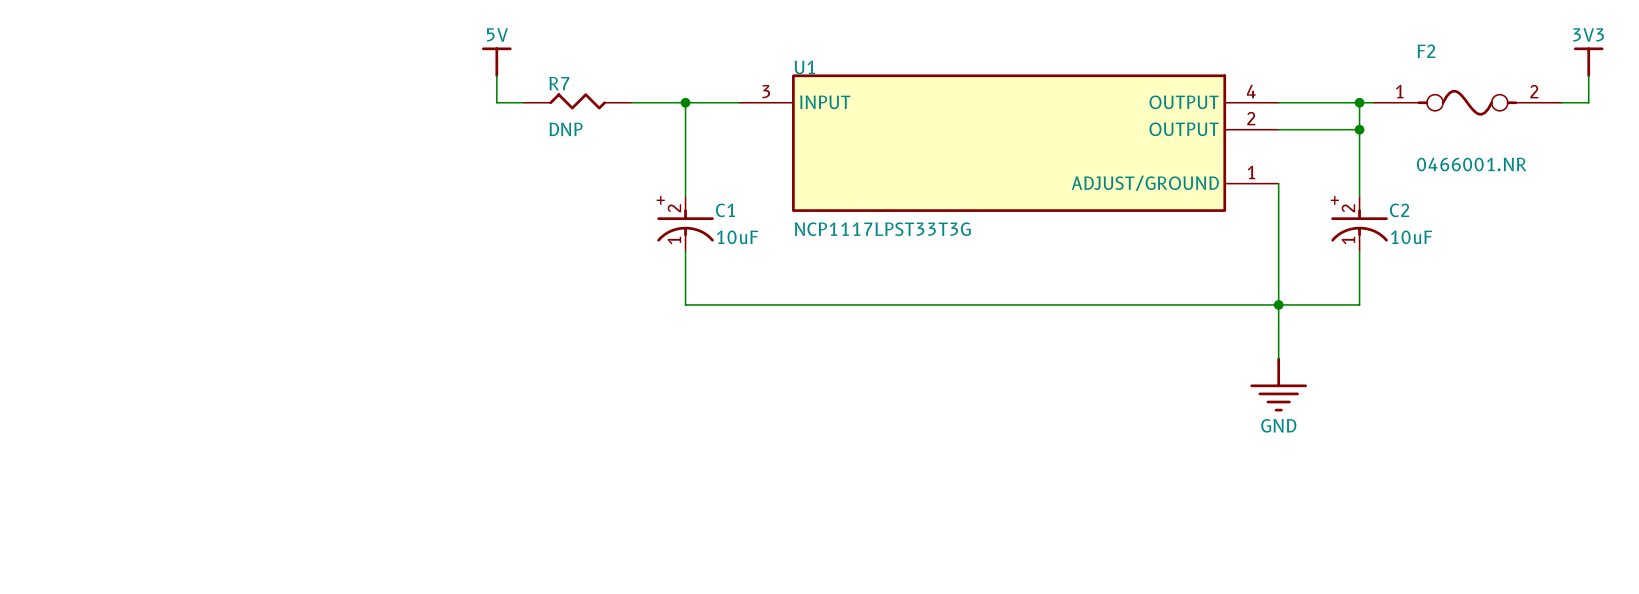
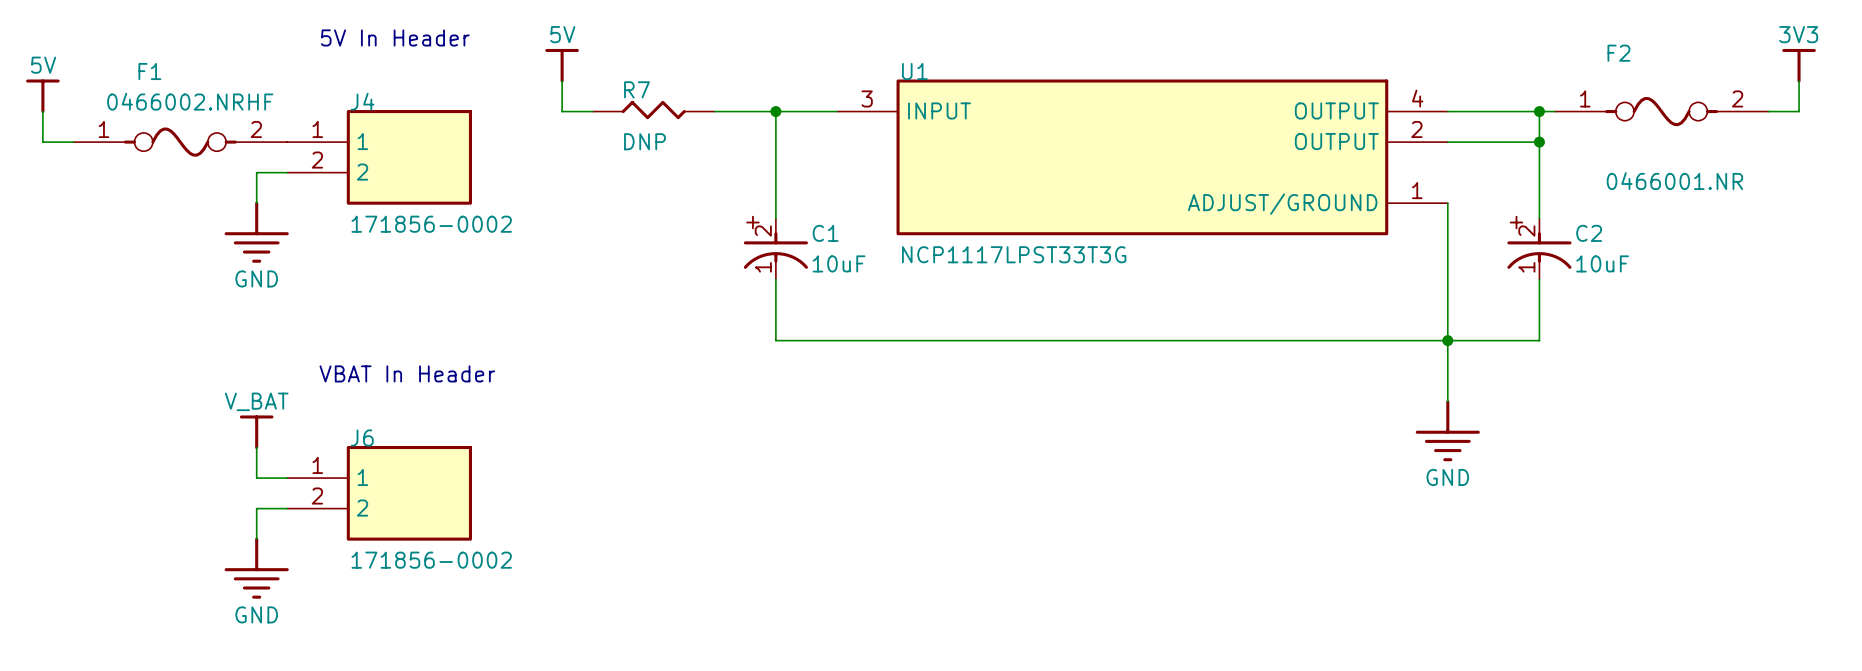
text: none -> 5V In Header (395, 37)
power symbol: none -> 5V (42, 96)
wire: none -> (42, 111) (42, 142) (73, 142)
F1: none -> 0466002.NRHF (180, 142)
J4: none -> 171856-0002 (379, 157)
wire: none -> (287, 172) (256, 172) (256, 203)
power symbol: none -> GND (256, 232)
text: none -> VBAT In Header (407, 373)
power symbol: none -> V_BAT (256, 432)
wire: none -> (256, 447) (256, 478) (287, 478)
J6: none -> 171856-0002 (379, 493)
wire: none -> (287, 508) (256, 508) (256, 539)
power symbol: none -> GND (256, 568)

